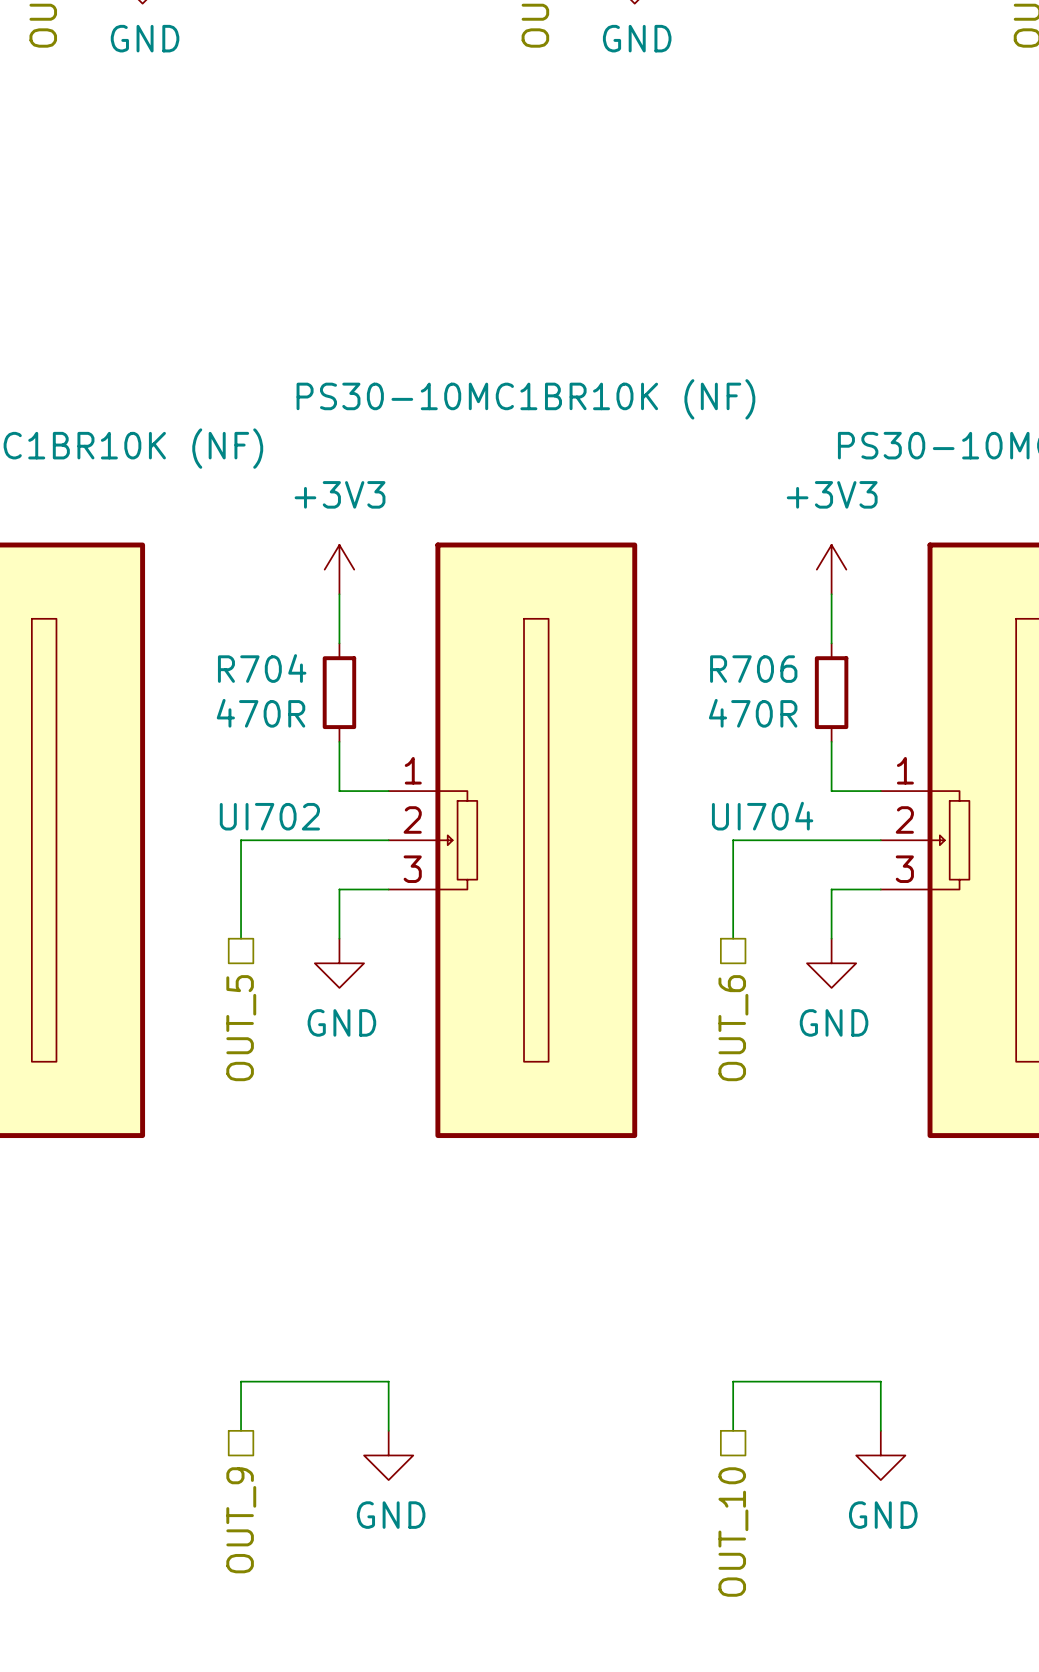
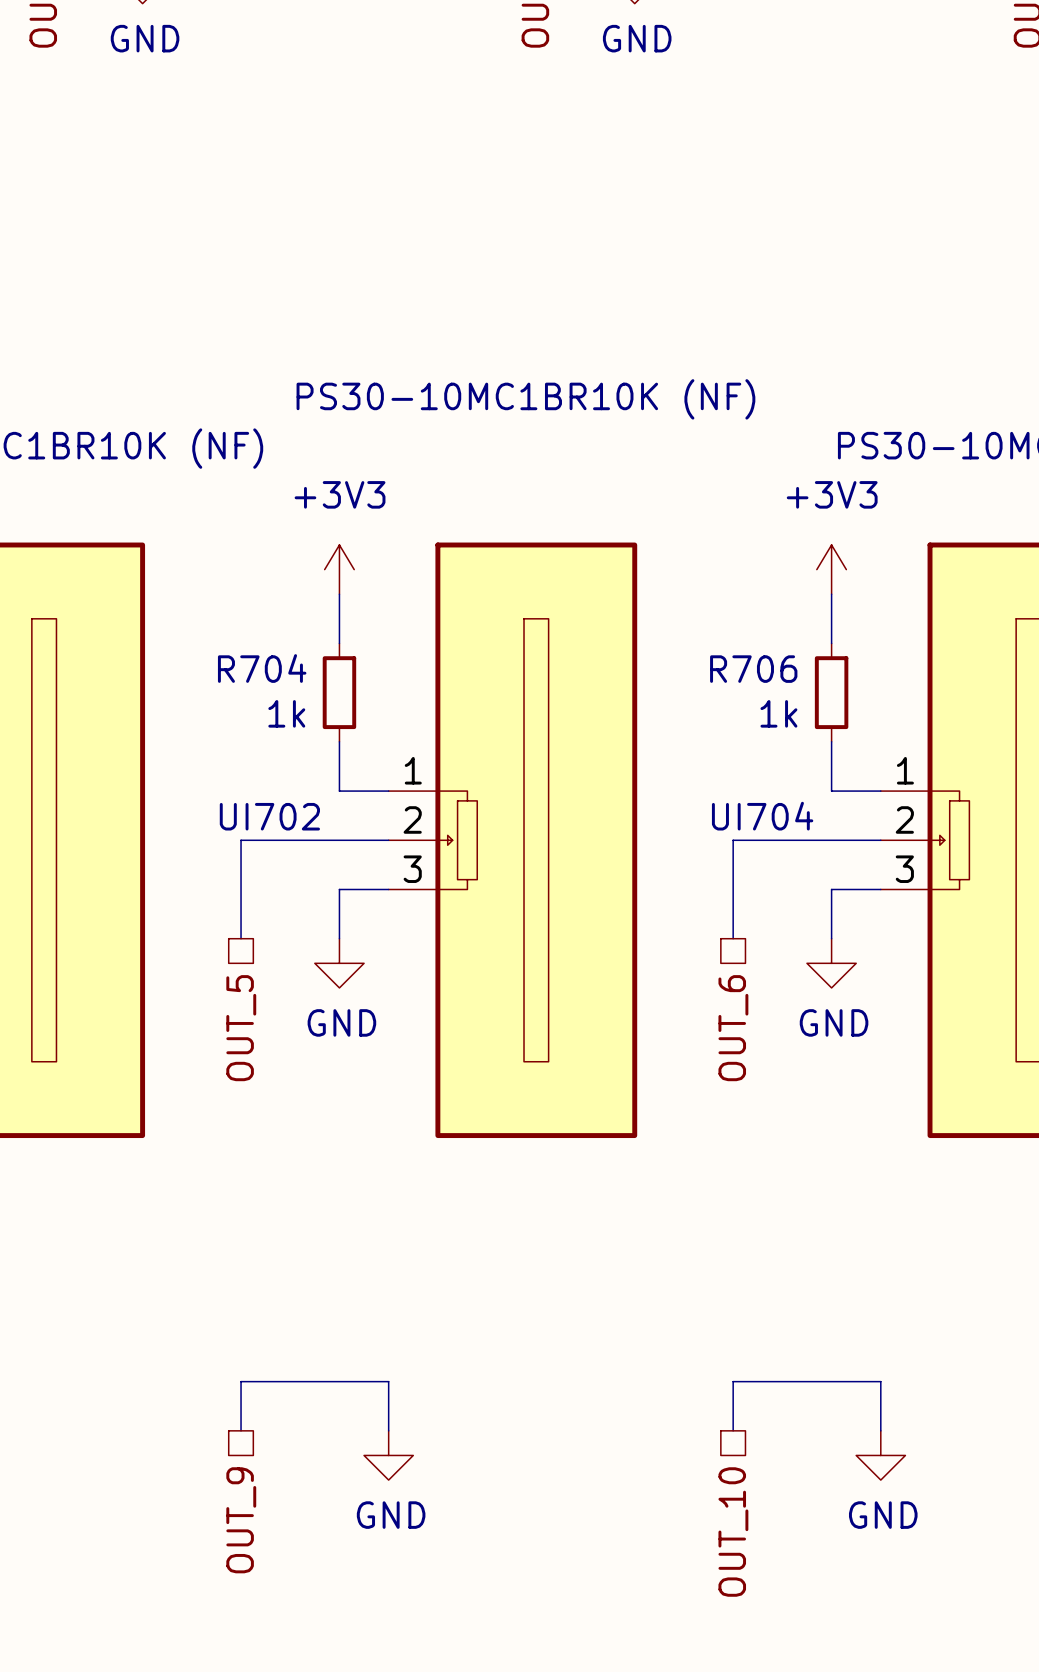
R704 value: 470R (261, 713) -> 1k (286, 713)
R706 value: 470R (753, 713) -> 1k (778, 713)

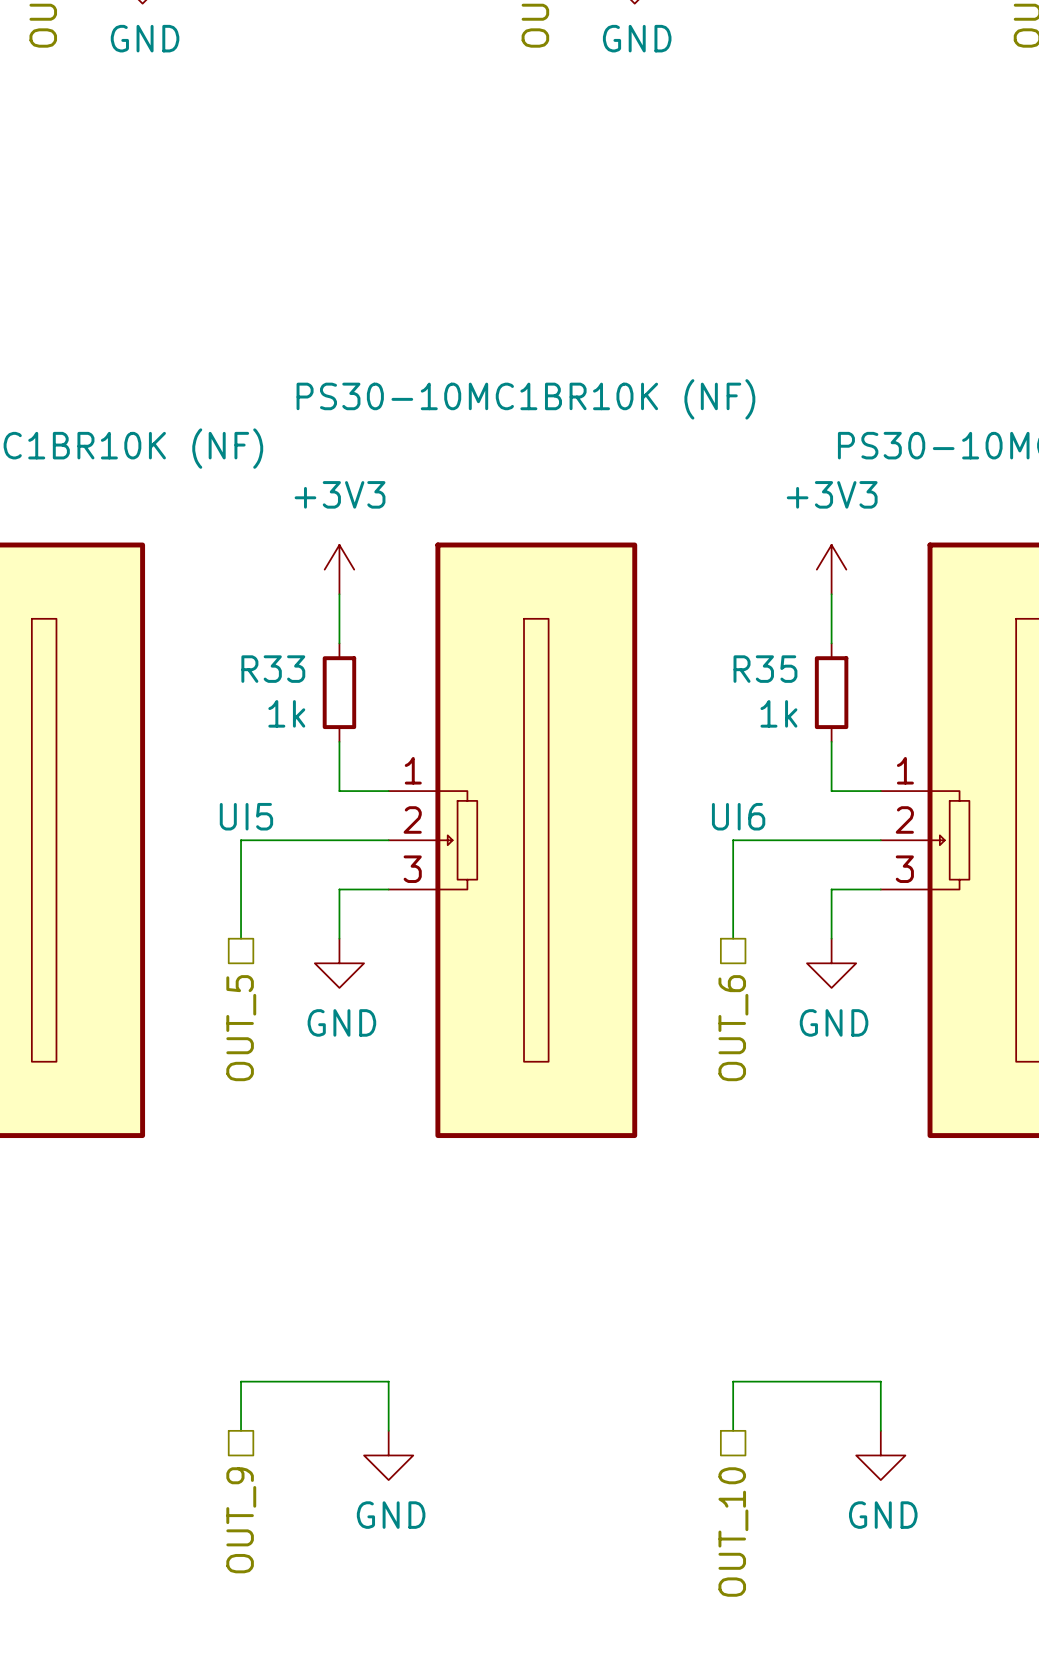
R704 name: R704 (262, 668) -> R33 (273, 669)
R706 name: R706 (753, 669) -> R35 (765, 669)
UI702 name: UI702 (269, 816) -> UI5 (246, 816)
UI704 name: UI704 (762, 816) -> UI6 (738, 816)

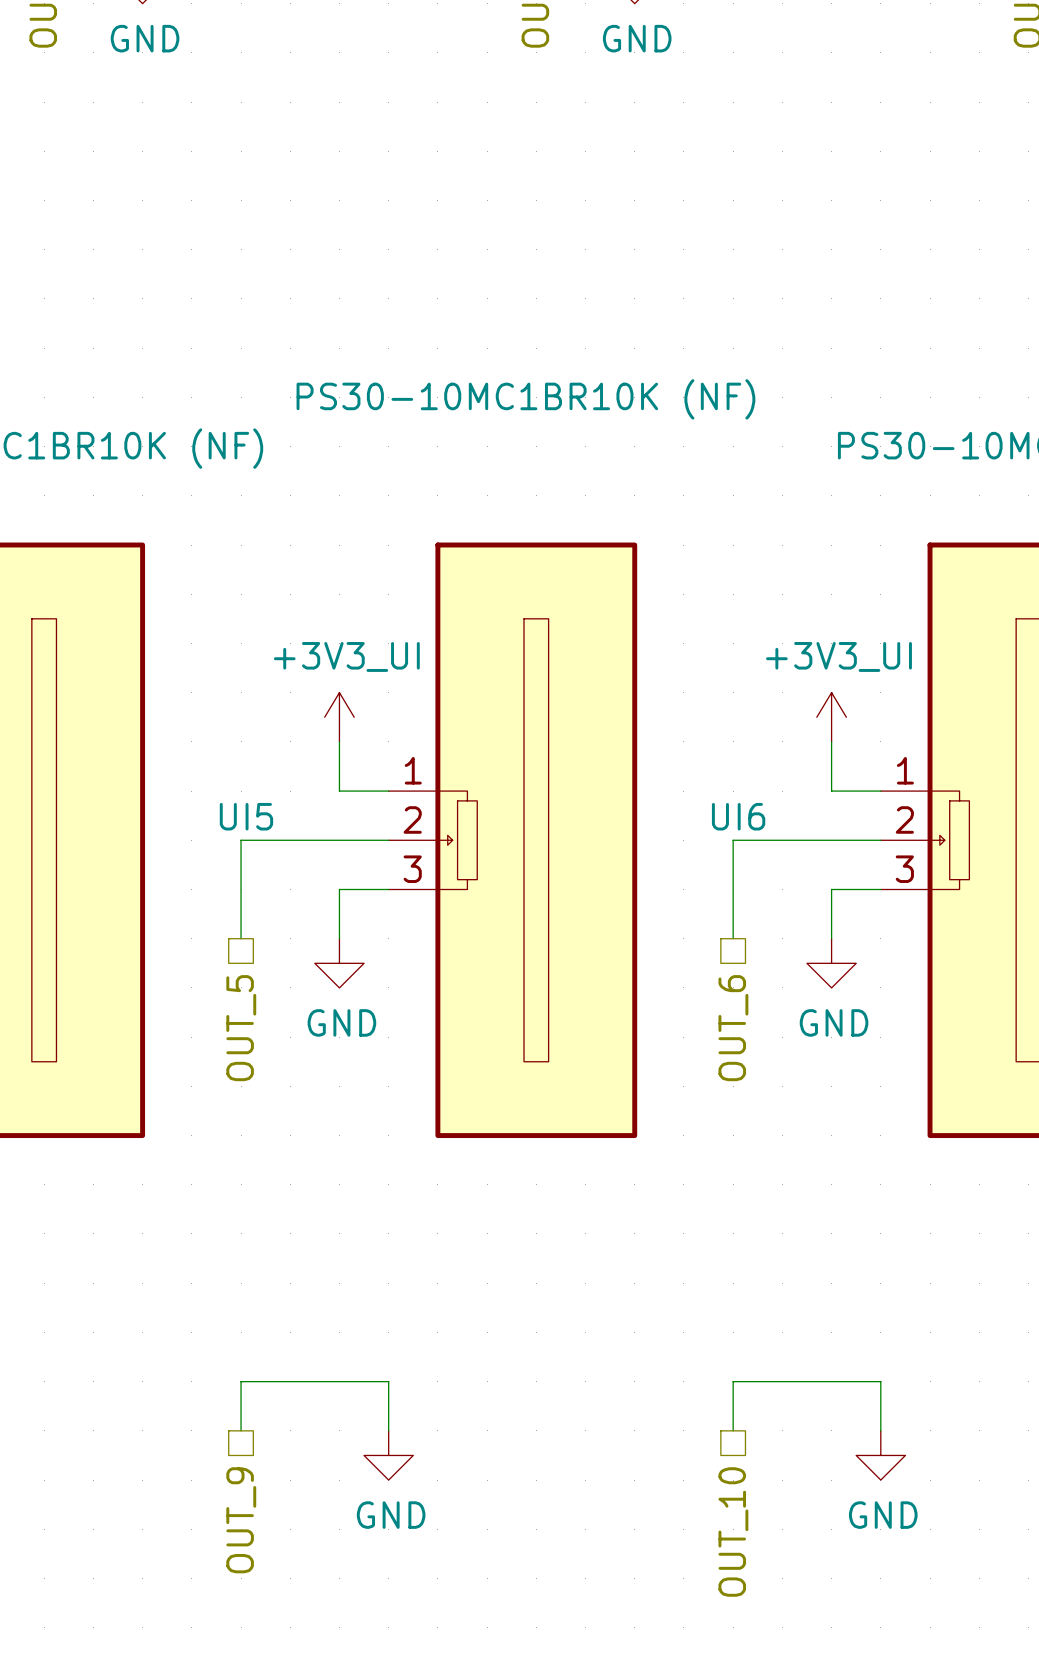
power symbol: +3V3 (339, 569) -> none
power symbol: +3V3 (831, 569) -> none
wire: (339, 594) (339, 643) -> none
wire: (831, 594) (831, 643) -> none
R33: 1k (339, 692) -> none
R35: 1k (831, 692) -> none
power symbol: none -> +3V3_UI (339, 717)
power symbol: none -> +3V3_UI (831, 717)

